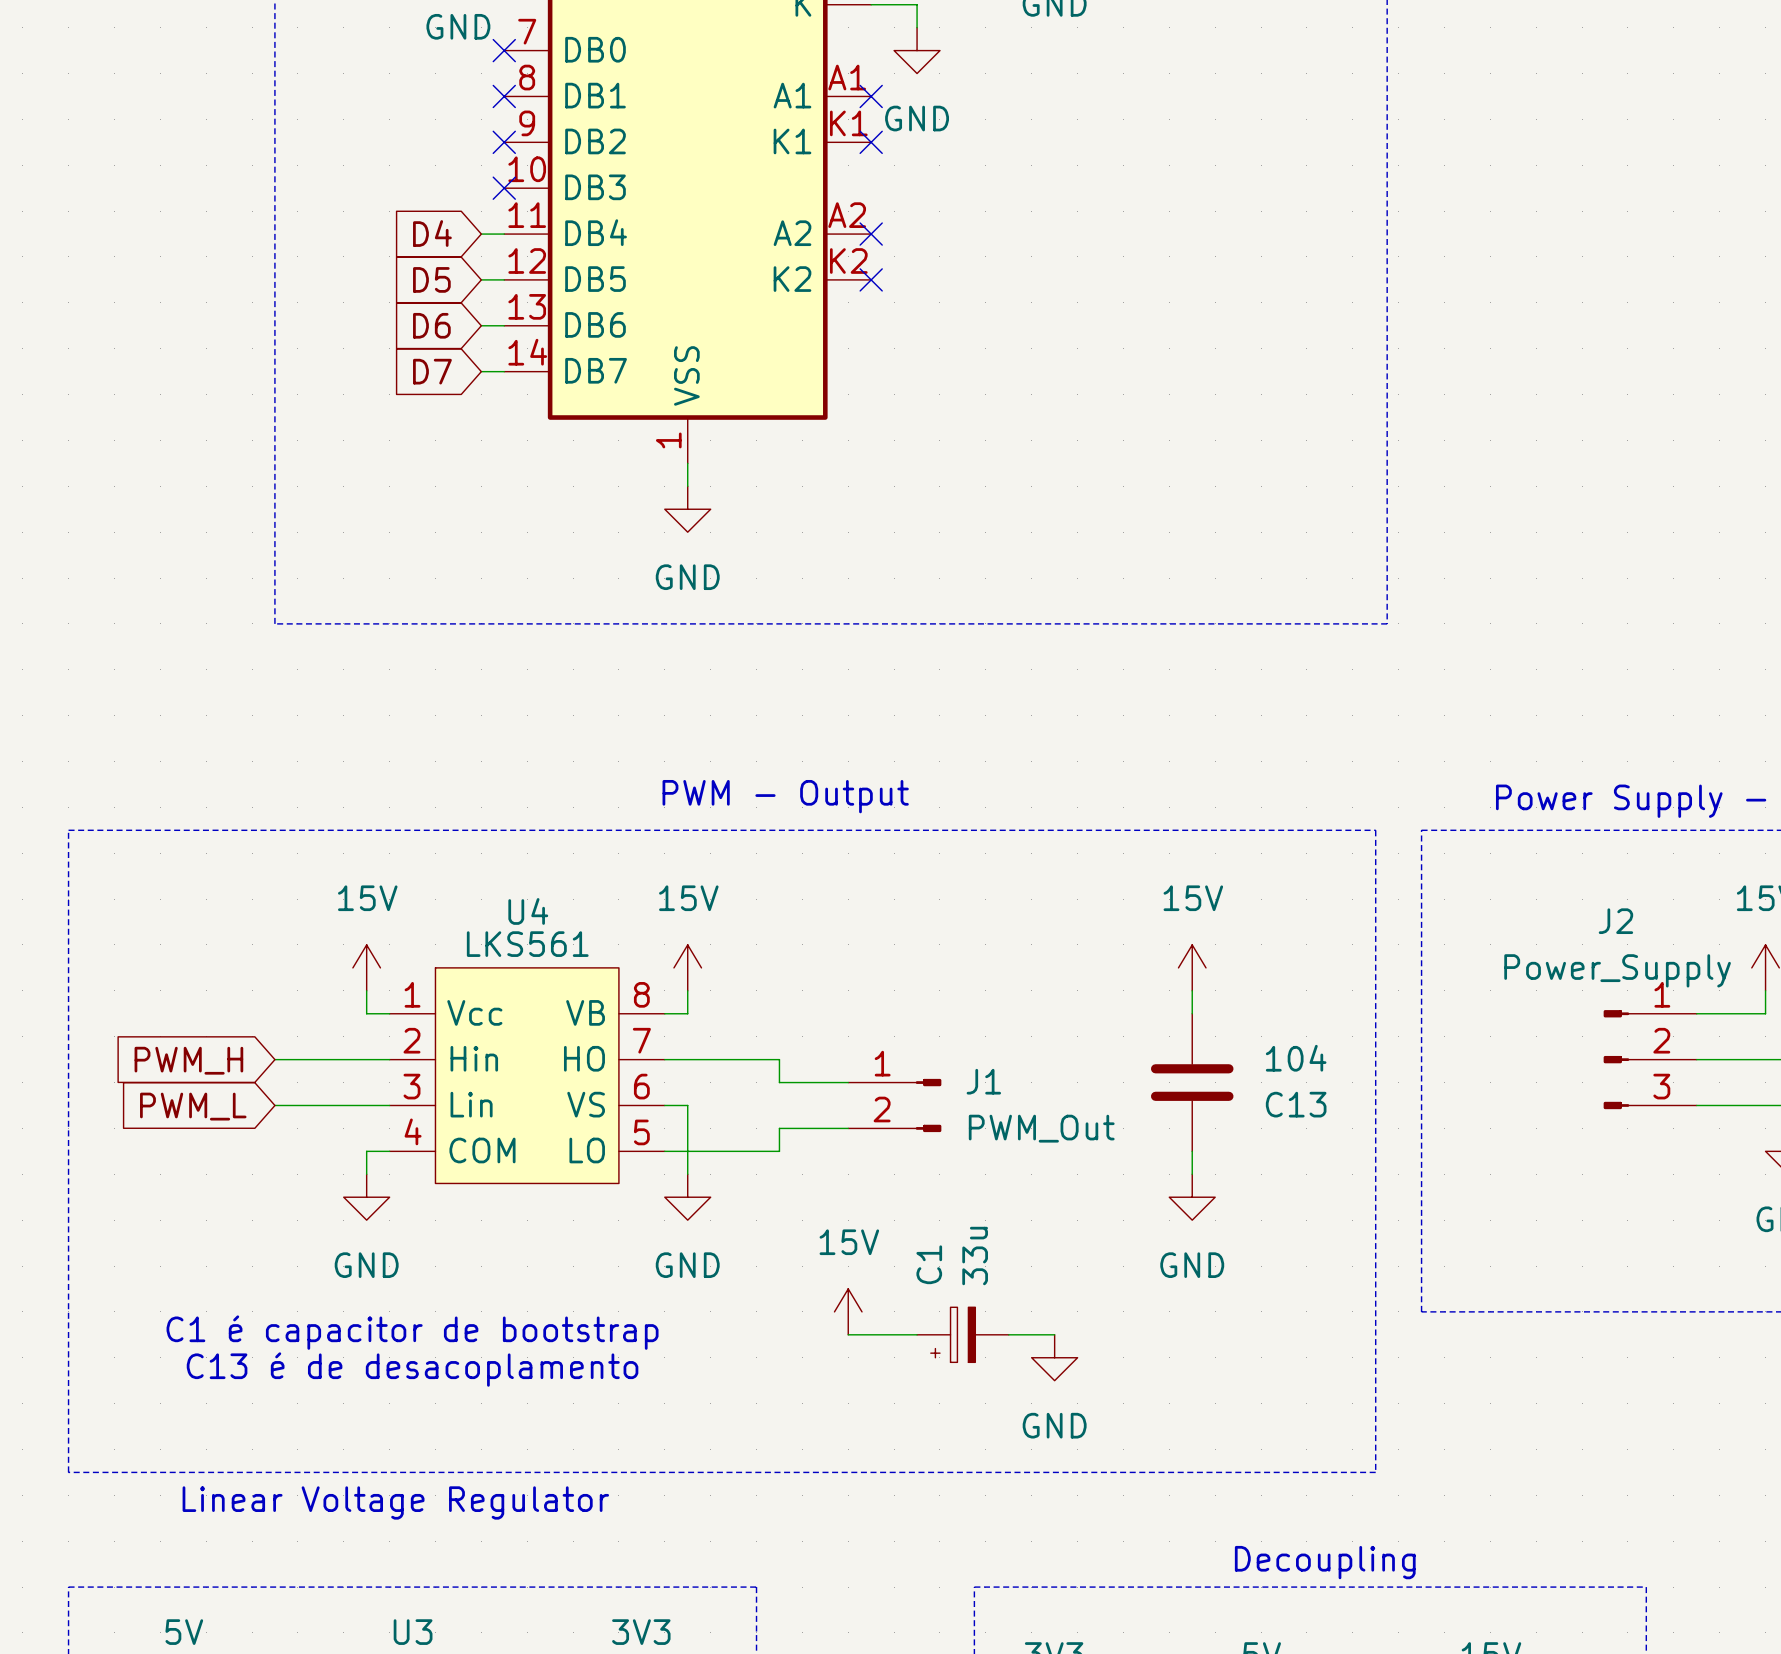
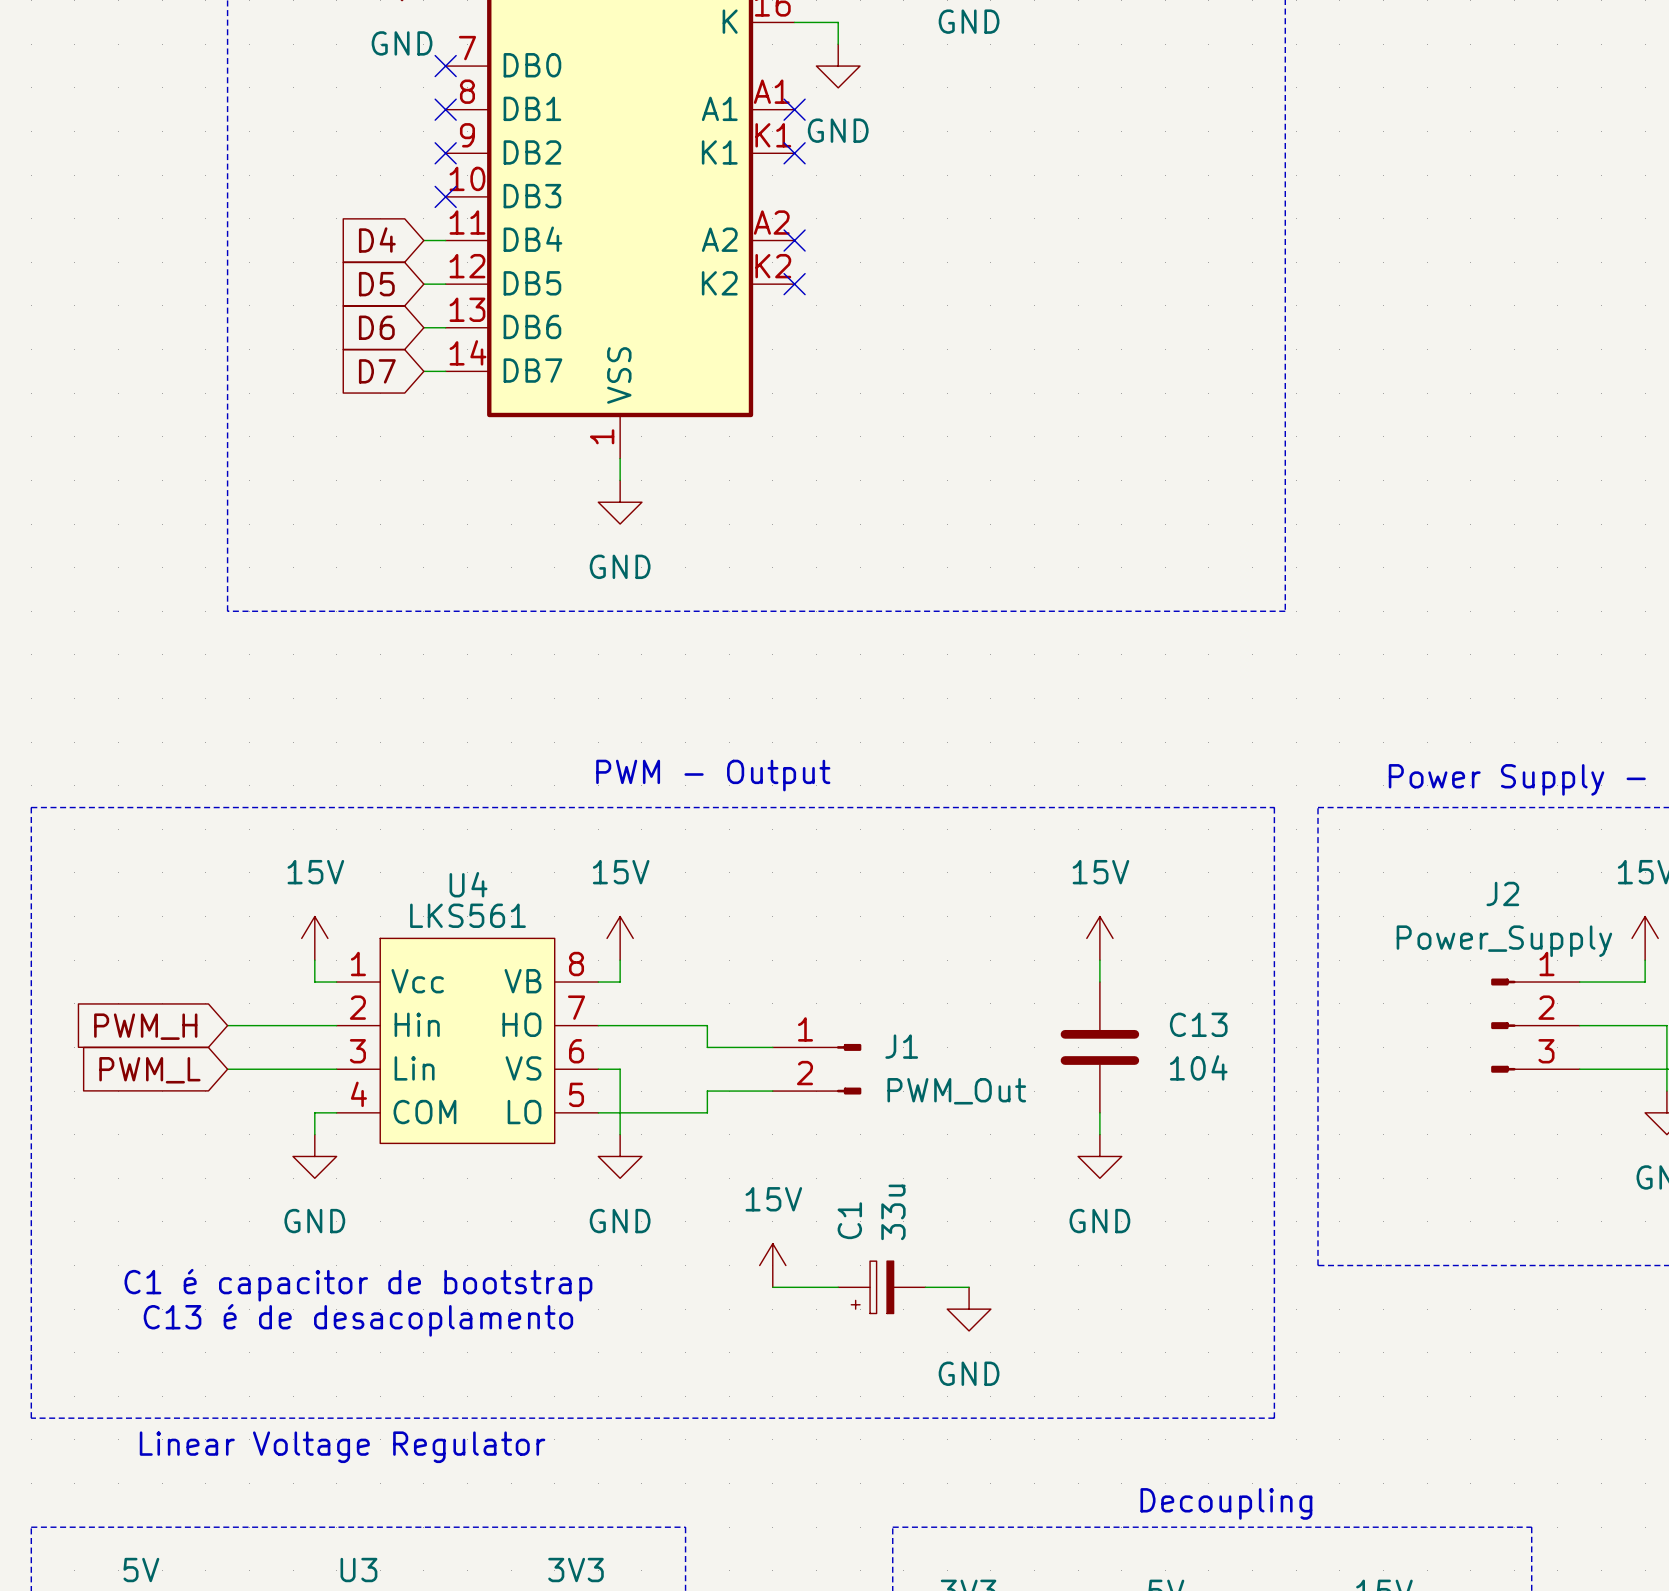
C13 value position: 104 (1296, 1058) -> 104 (1198, 1067)
C13 name position: C13 (1296, 1104) -> C13 (1198, 1024)

